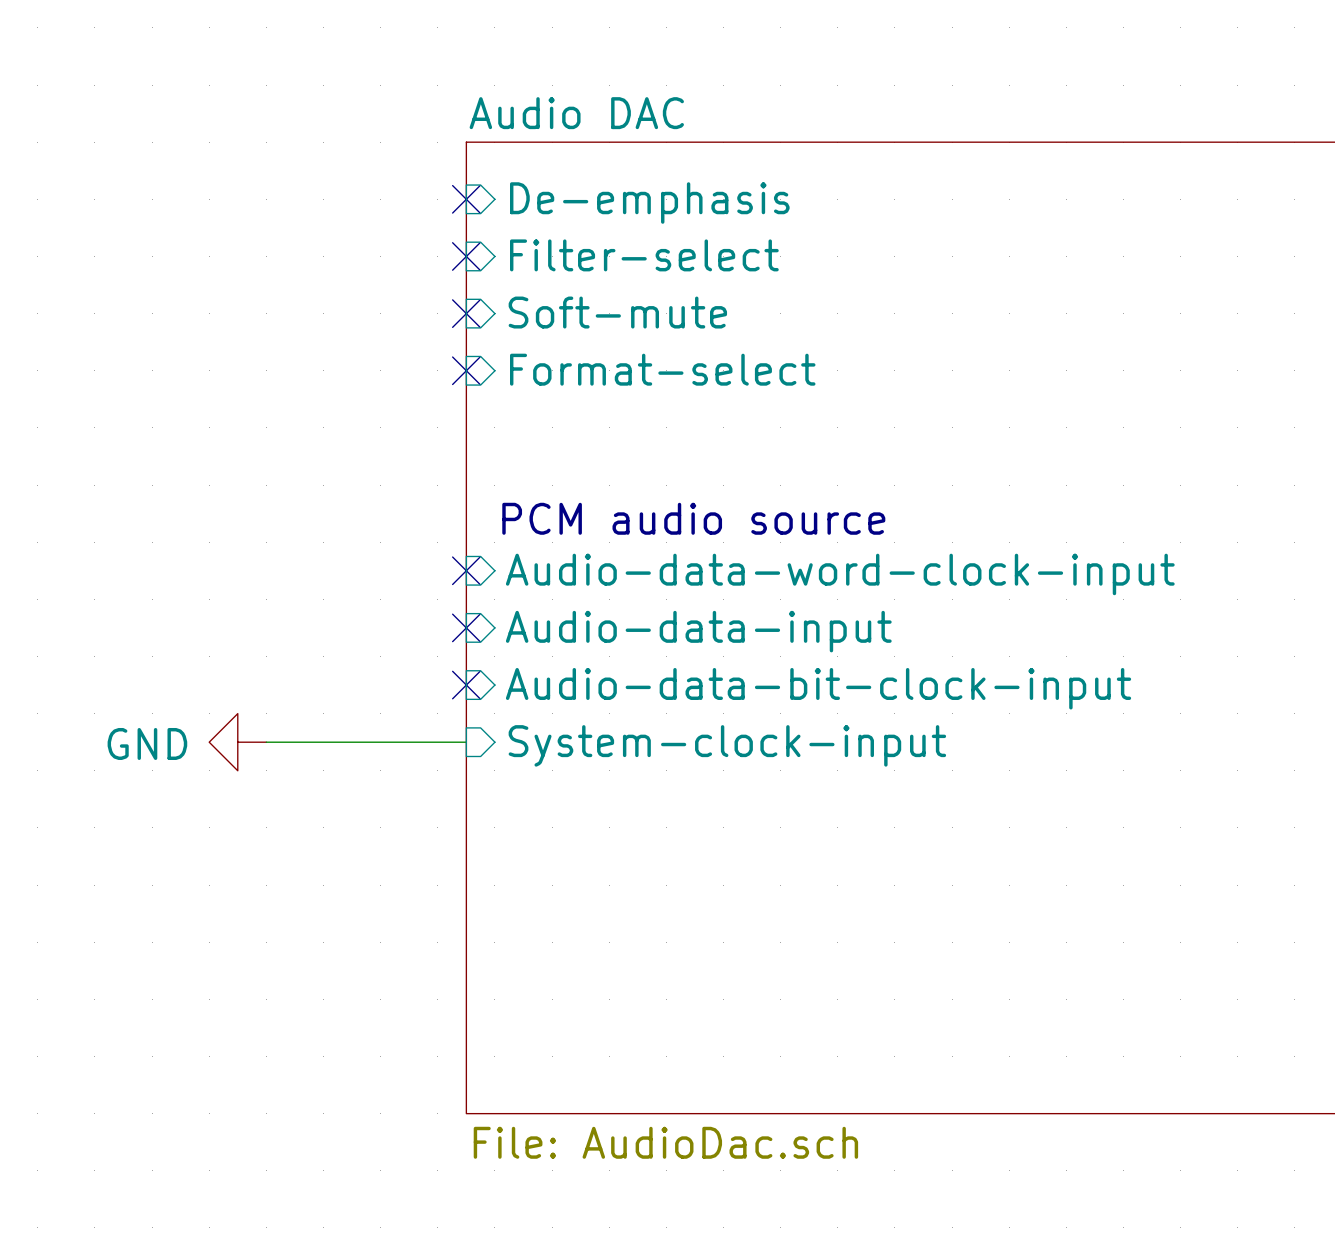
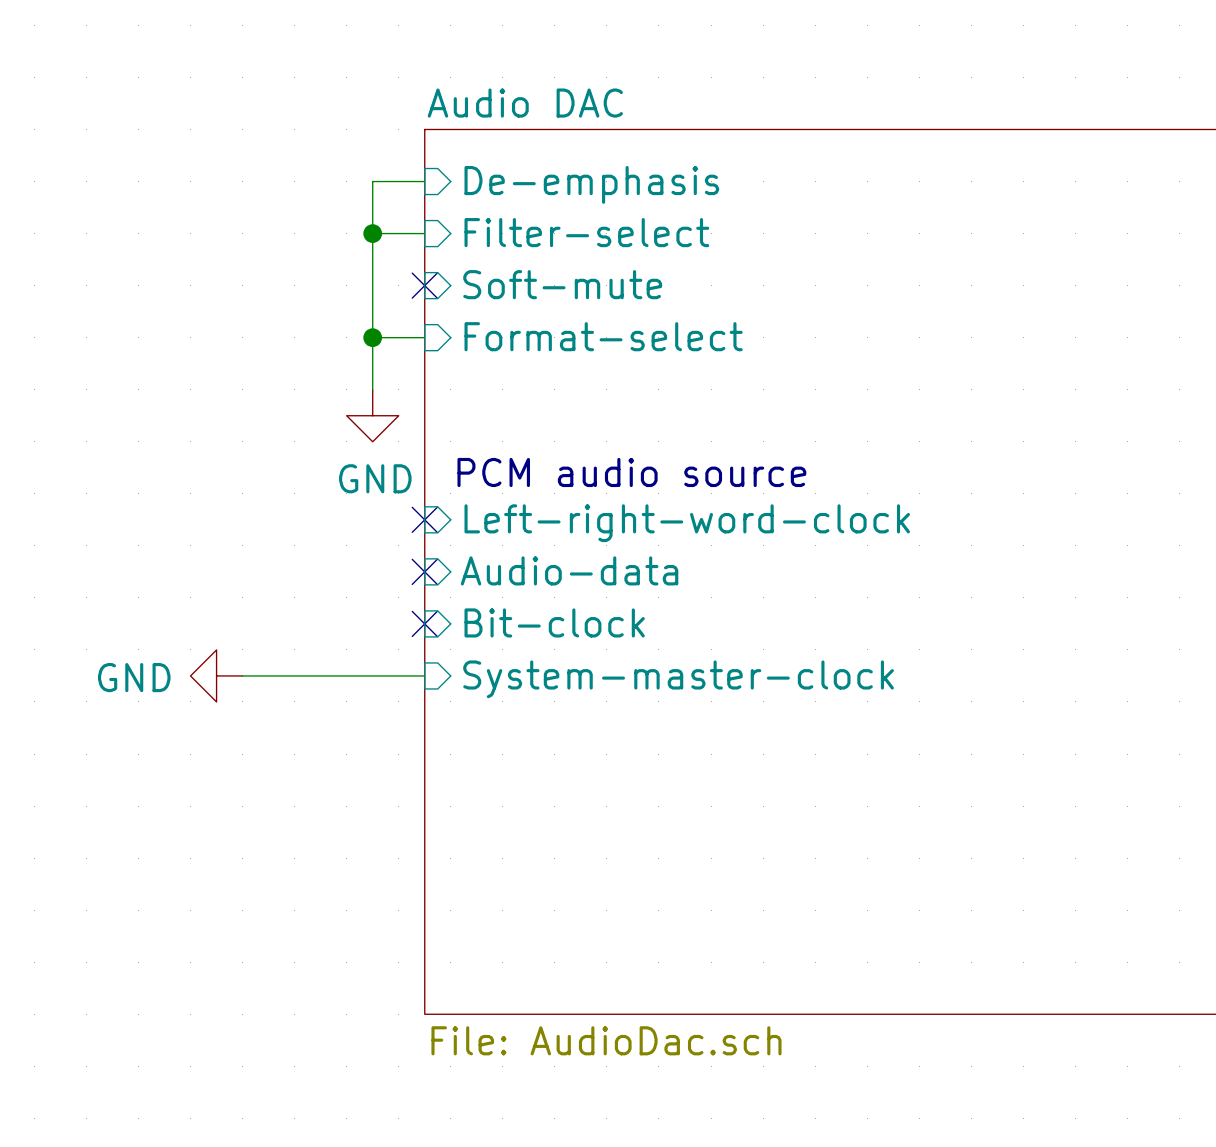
wire: none -> (424, 181) (372, 181) (372, 389)
no-connect mark: (466, 199) -> none
wire: none -> (372, 233) (424, 233)
junction: none -> (372, 233)
no-connect mark: (466, 256) -> none
wire: none -> (372, 337) (424, 337)
junction: none -> (372, 337)
no-connect mark: (466, 370) -> none
power symbol: none -> GND (372, 415)
sheet pin: Audio-data-word-clock-input (840, 574) -> Left-right-word-clock (687, 523)
sheet pin: Audio-data-input (698, 631) -> Audio-data (569, 570)
sheet pin: Audio-data-bit-clock-input (818, 688) -> Bit-clock (554, 622)
sheet pin: System-clock-input (727, 745) -> System-master-clock (678, 679)

